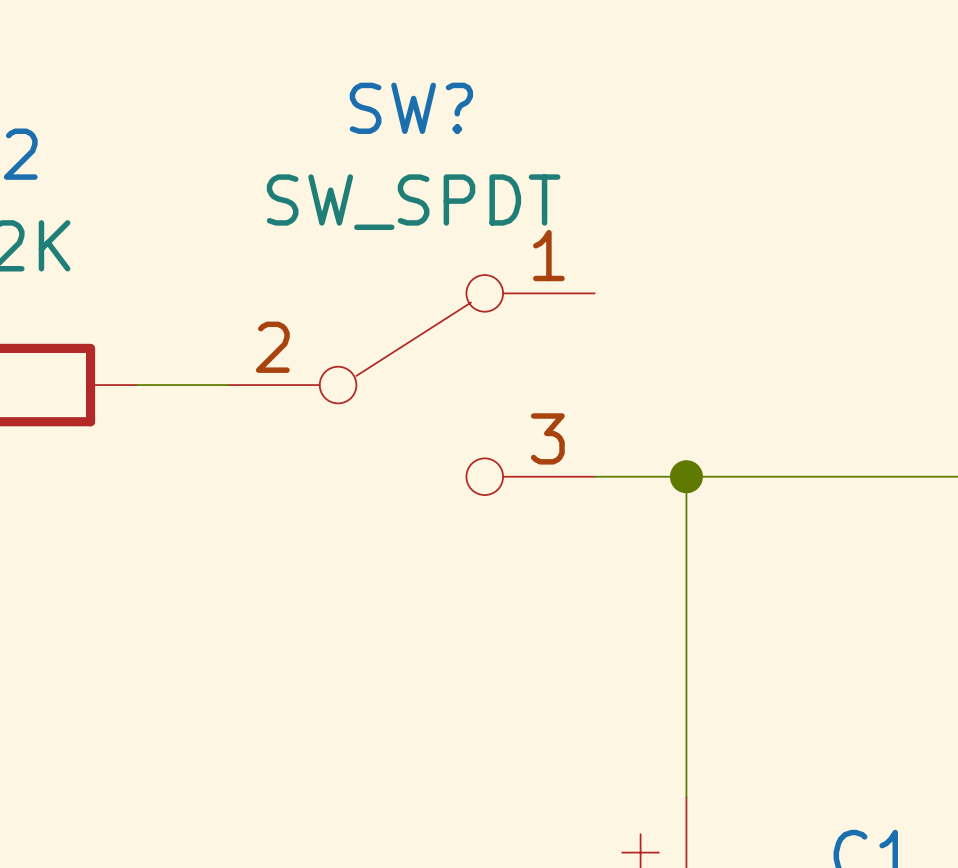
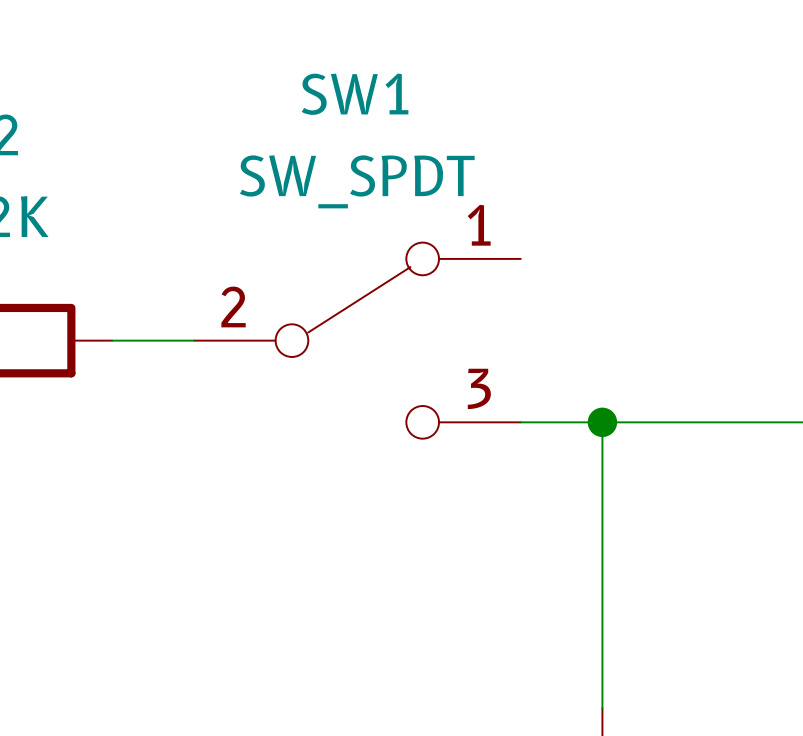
SW? name: SW? (411, 108) -> SW1 (355, 94)

